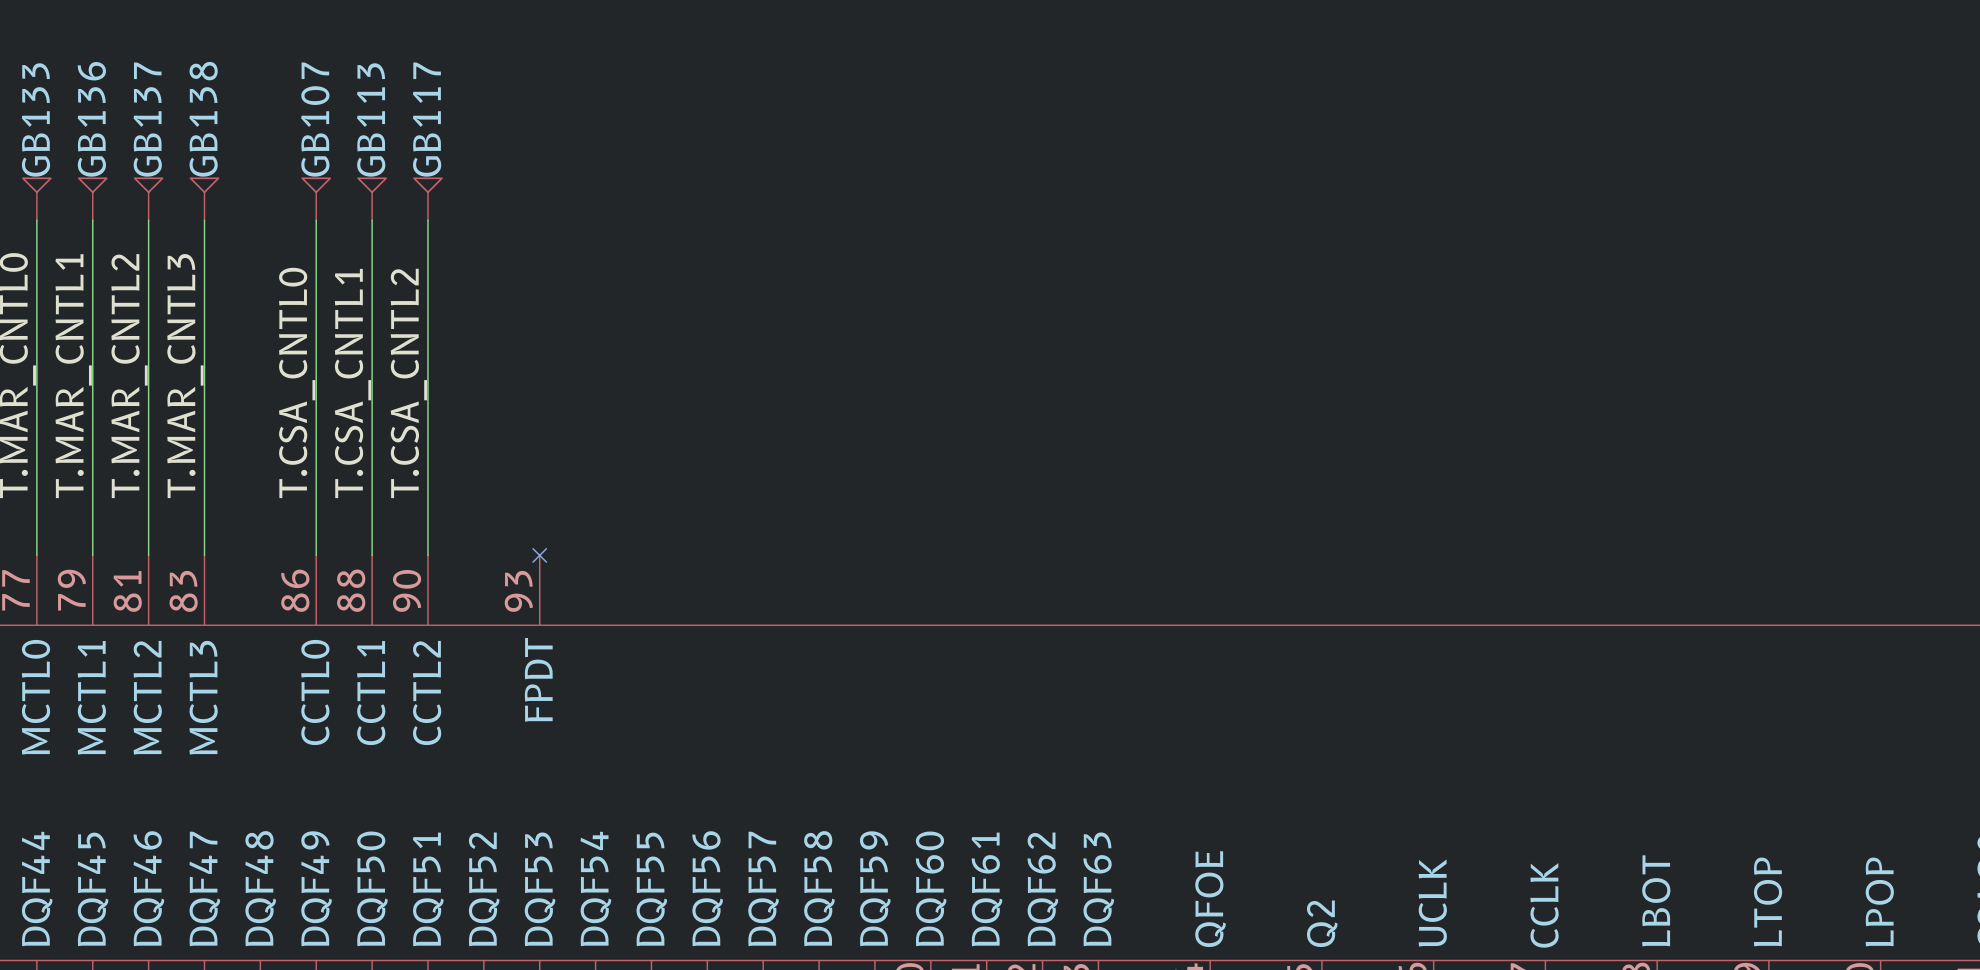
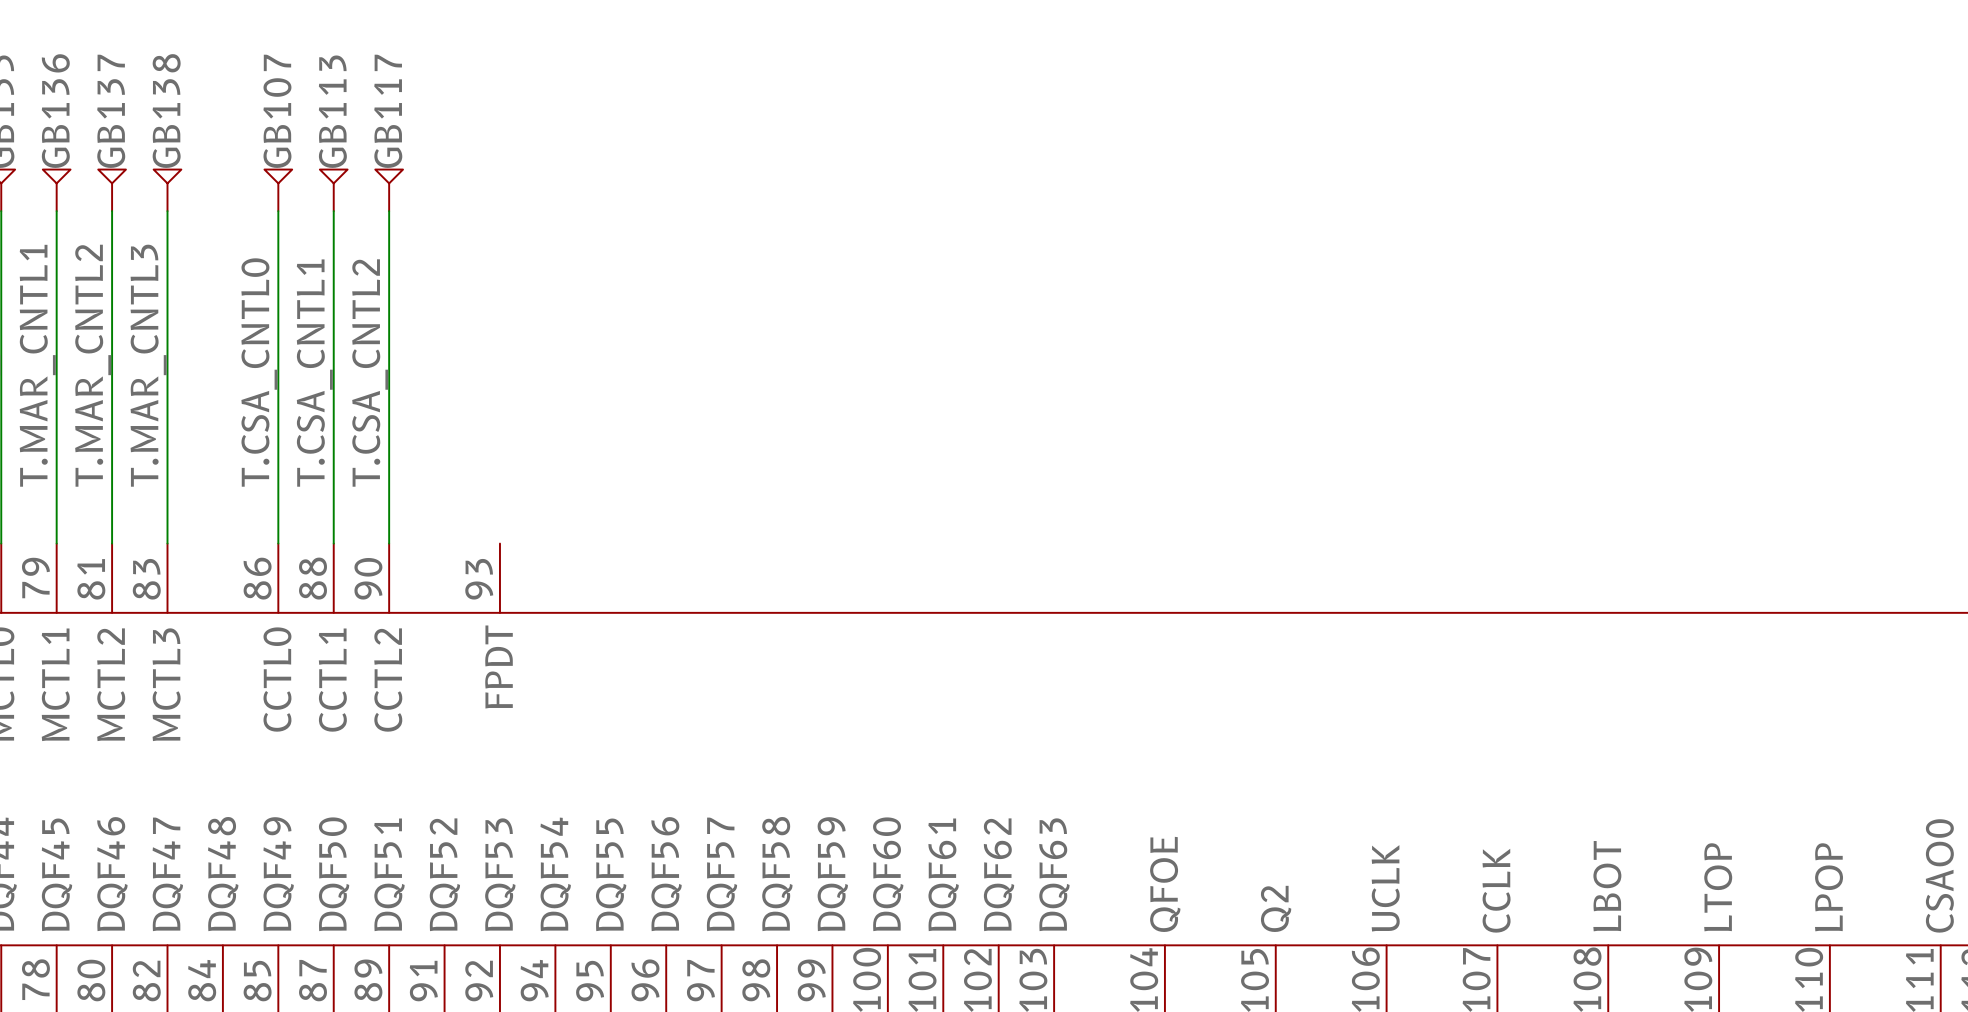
no-connect mark: (539, 555) -> none

